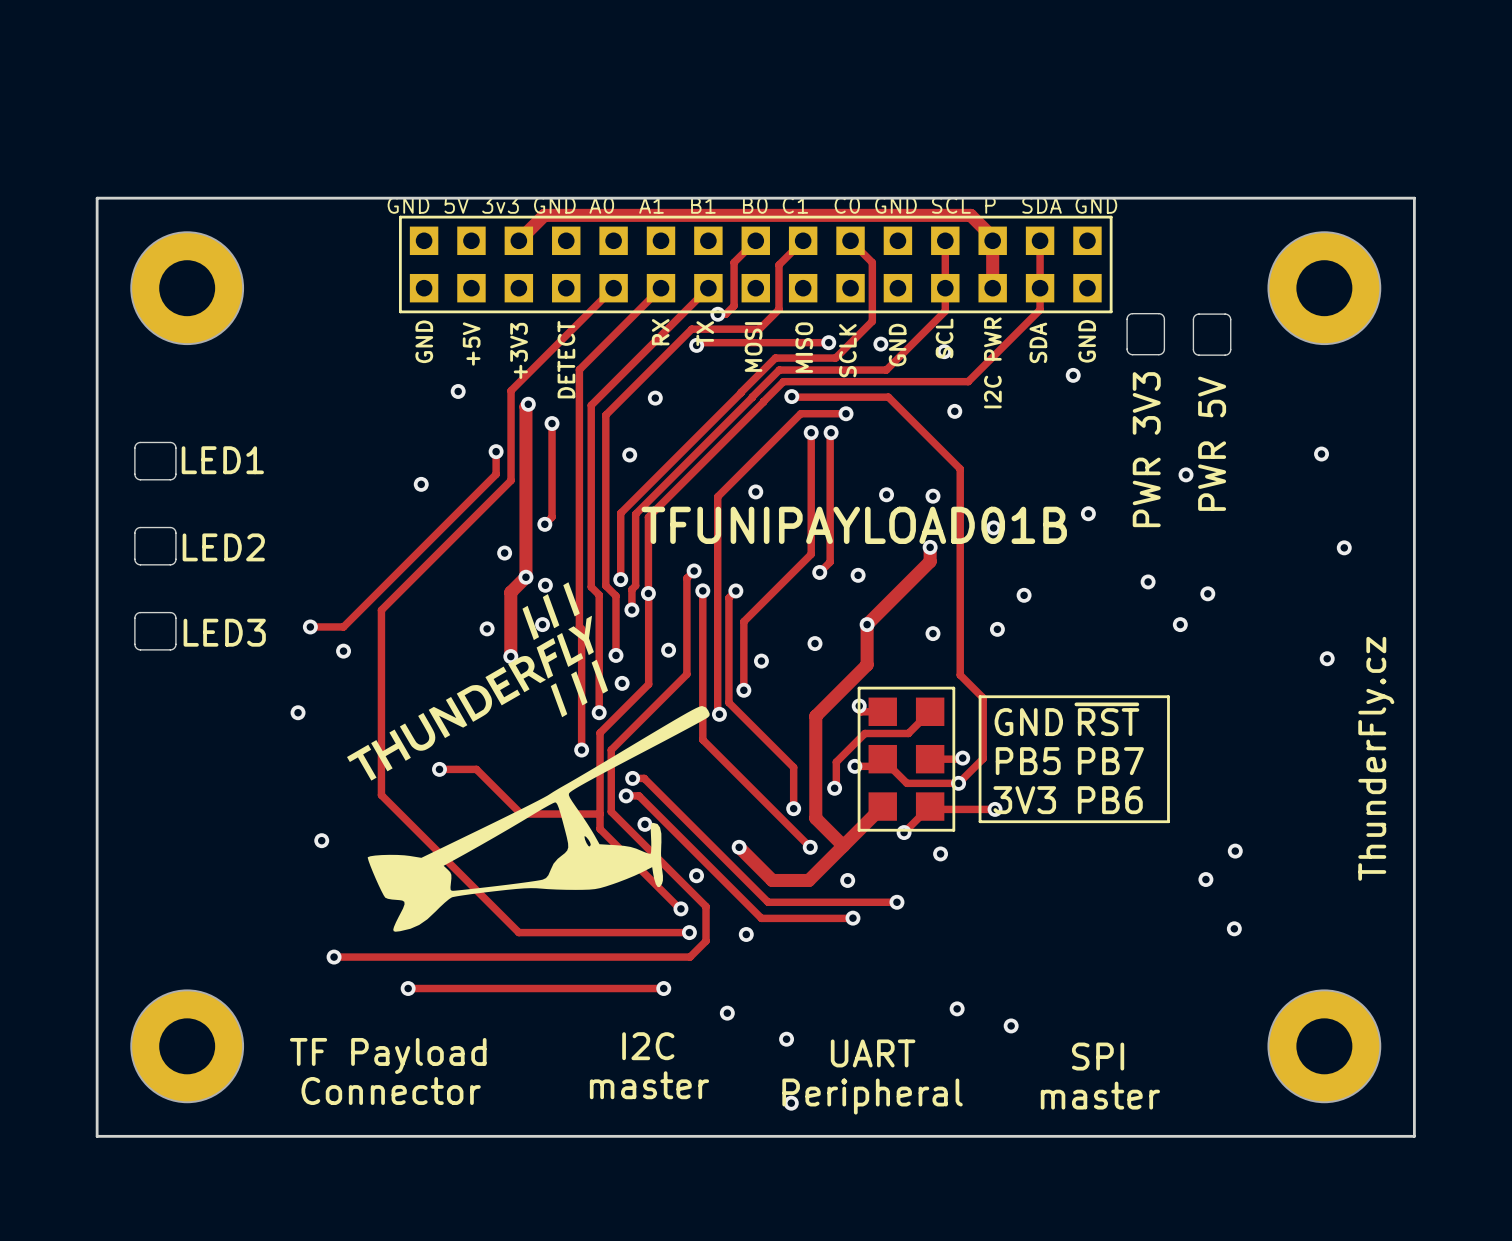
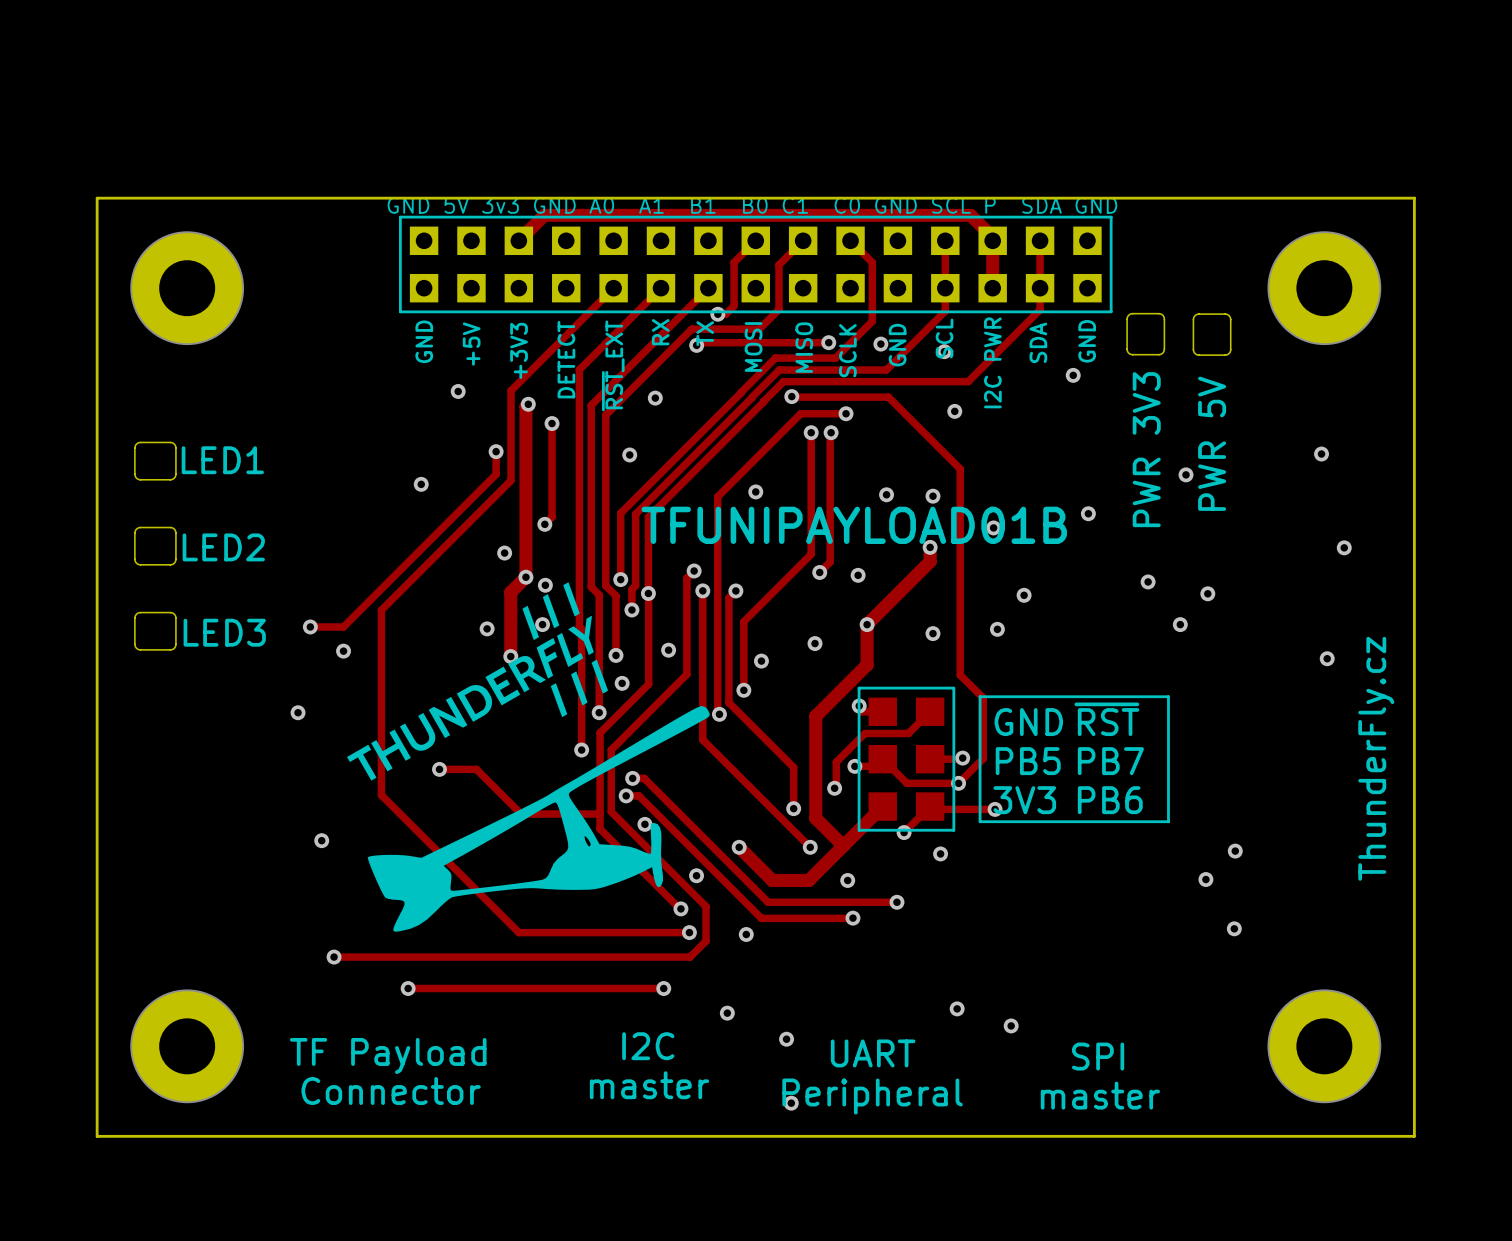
text: none -> ~{RST}_EXT (613, 365)

